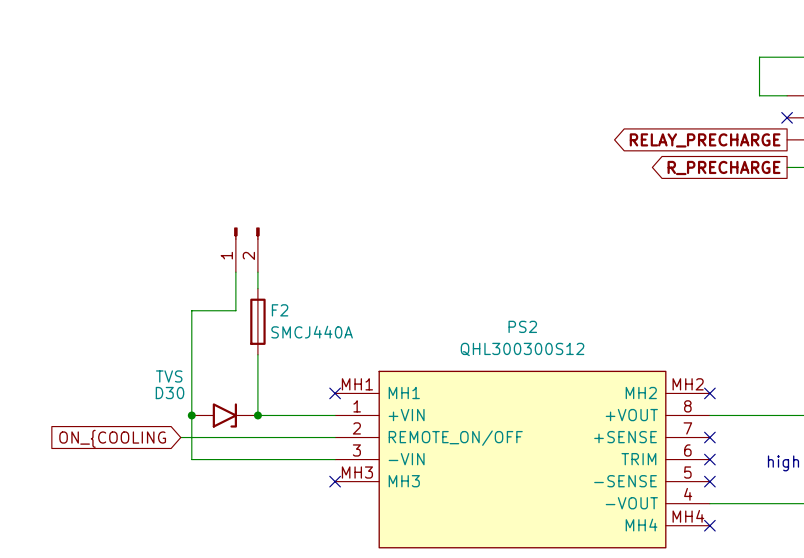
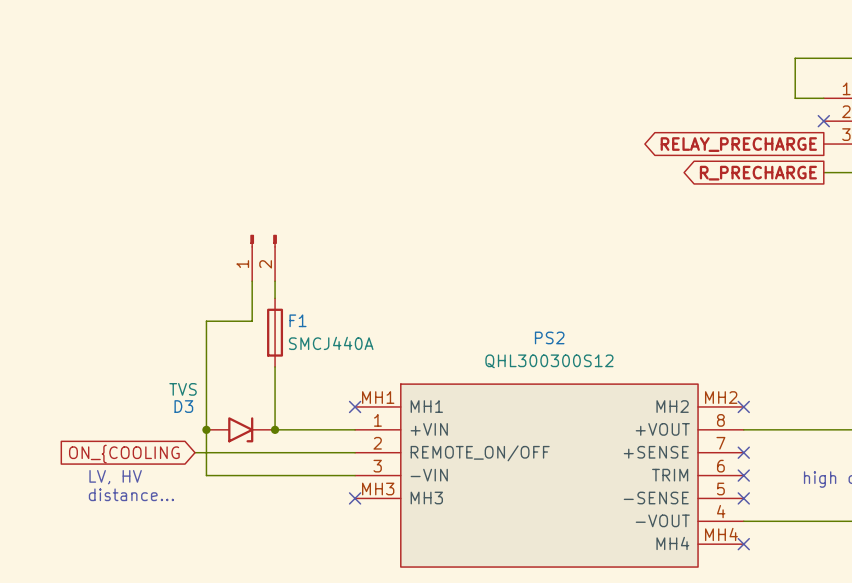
F2 name: F2 (280, 310) -> F1 (297, 320)
D30 name: D30 (170, 393) -> D3 (183, 406)
text: none -> LV, HV (115, 477)
text: none -> distance... (131, 494)

